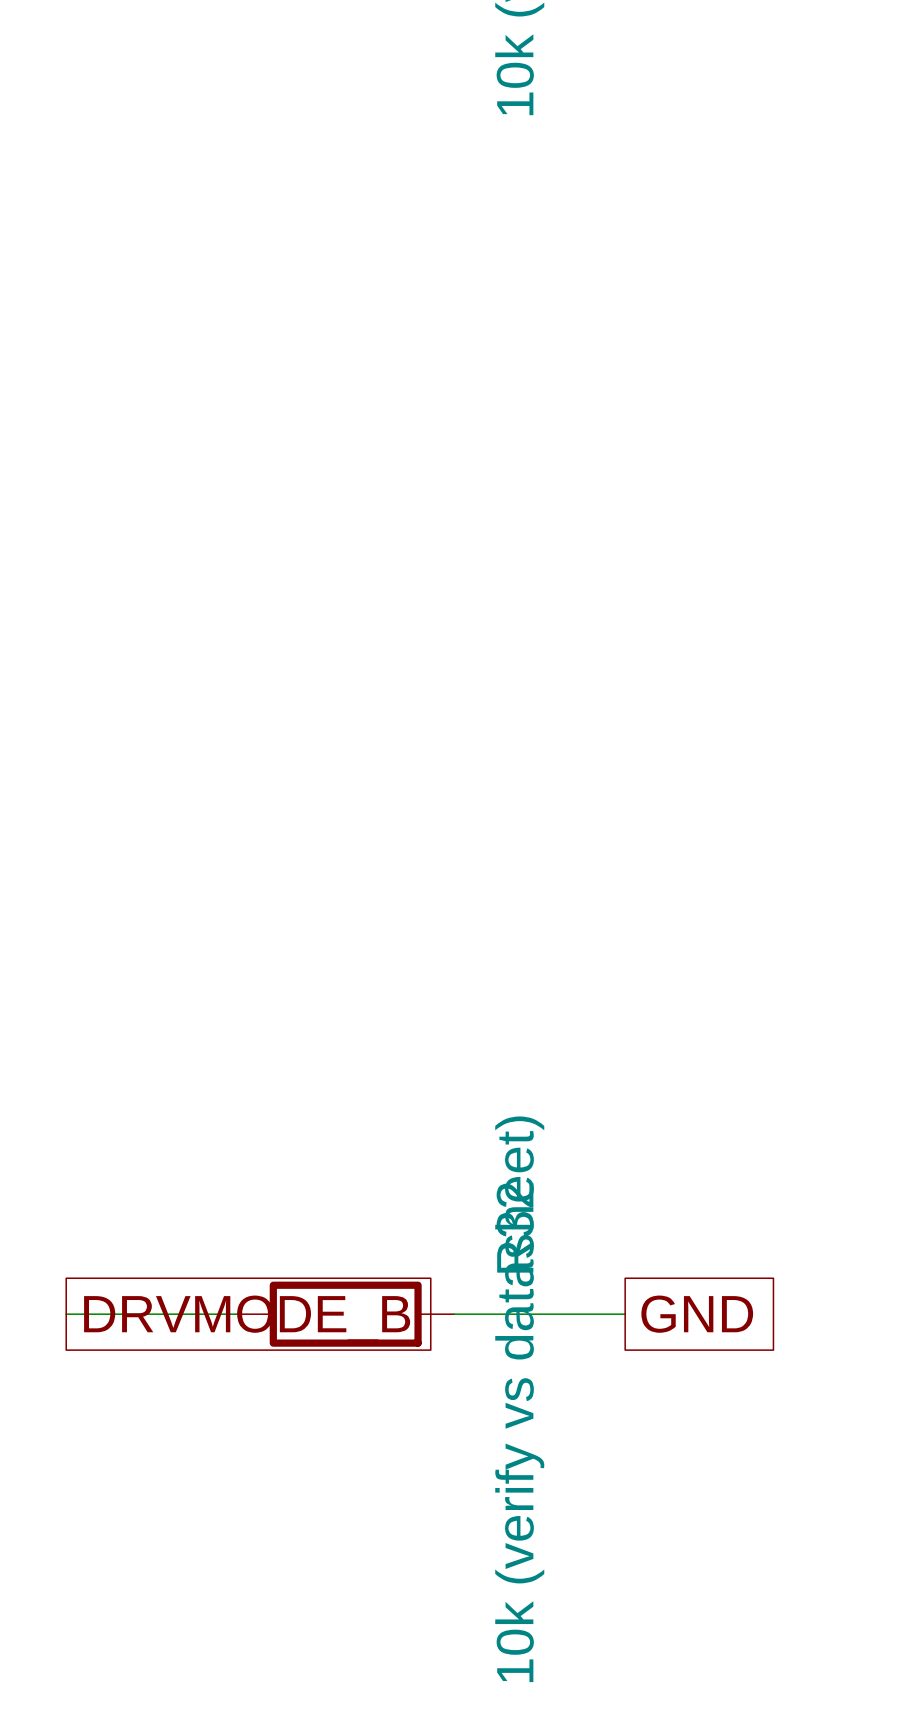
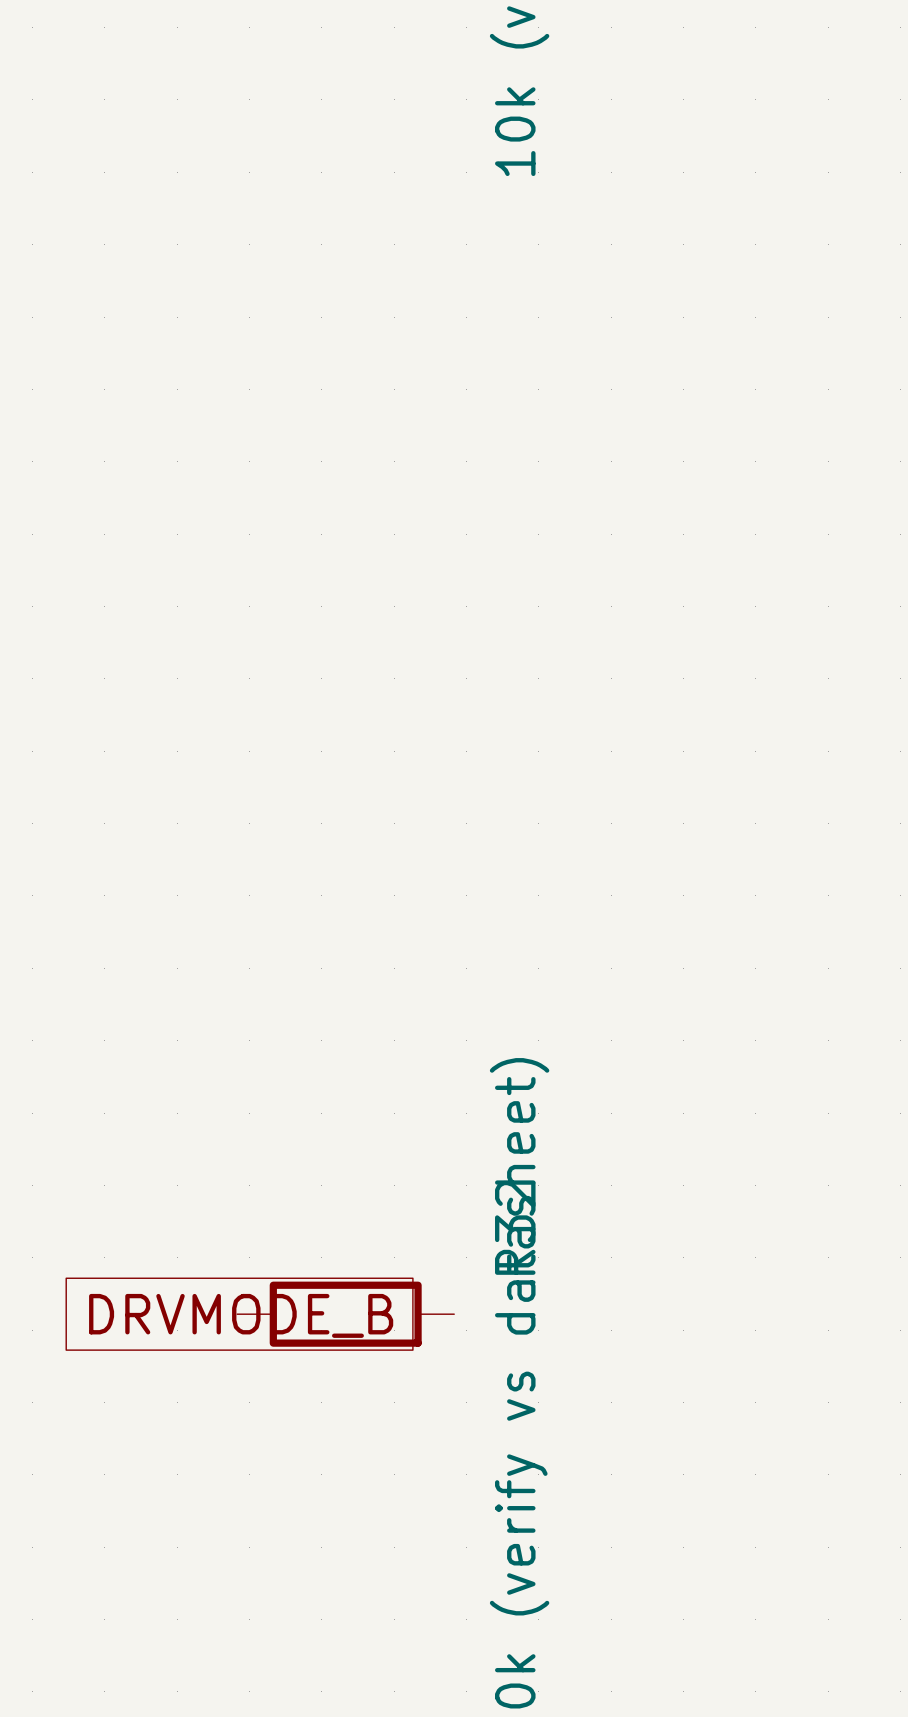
wire: (66, 1314) (237, 1314) -> none
wire: (454, 1314) (625, 1314) -> none
global label: GND (697, 1314) -> none

